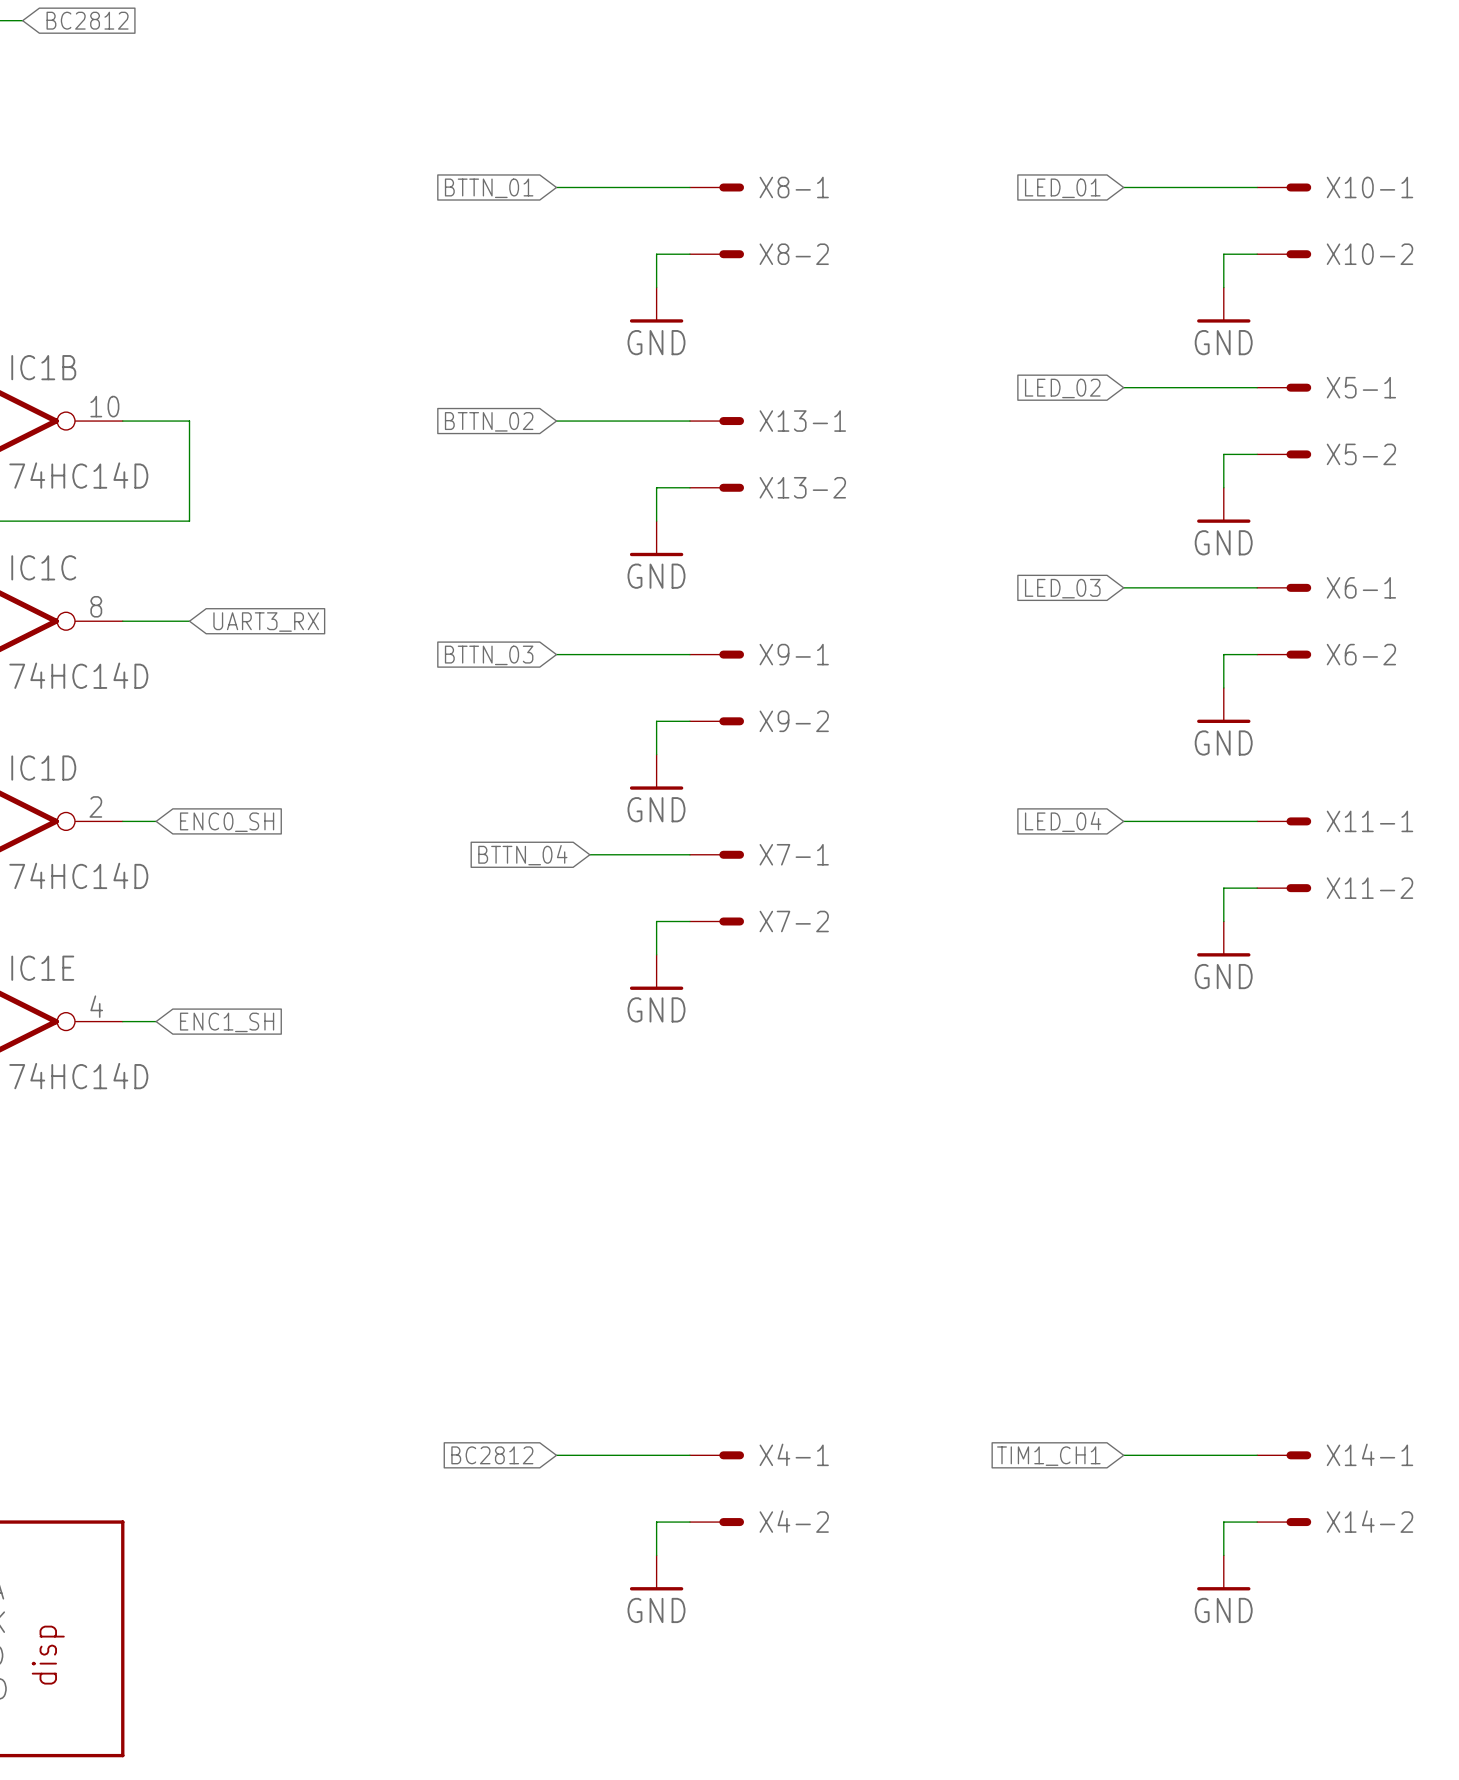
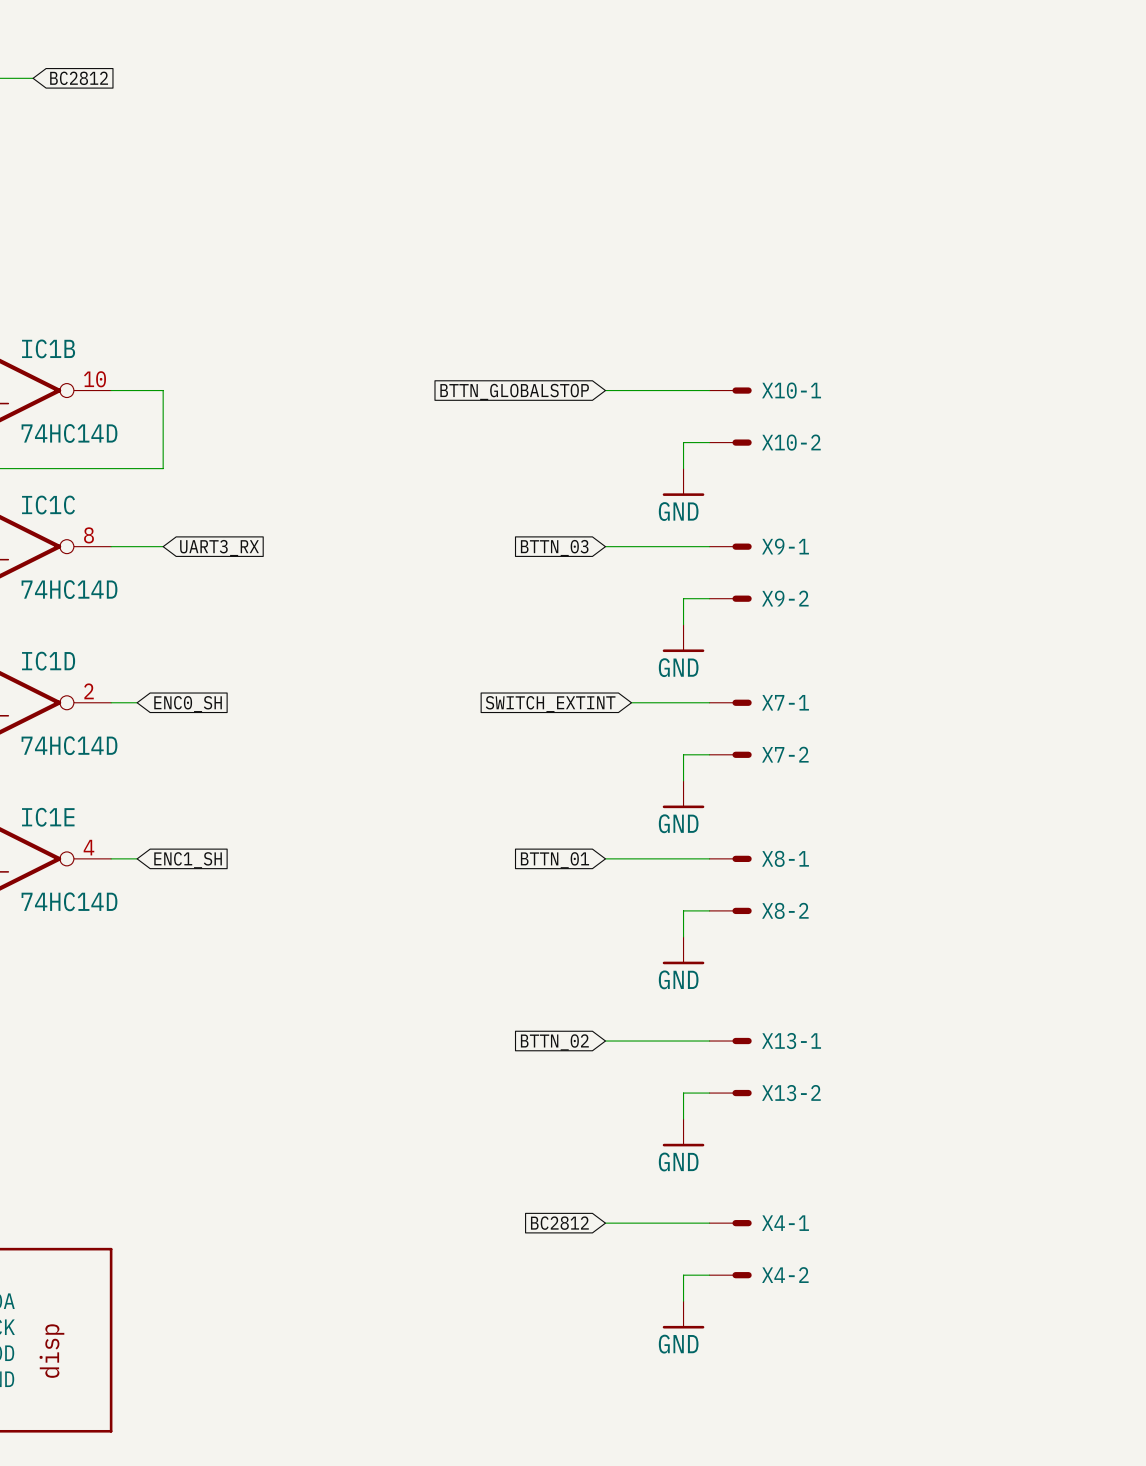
wire: (556, 187) (689, 187) -> none
X8-1 position: (716, 187) -> (730, 858)
wire: (1123, 187) (1257, 187) -> none
X10-1 position: (1284, 187) -> (730, 390)
global label: BTTN_01 (489, 188) -> none
global label: LED_01 (1062, 188) -> none
wire: (689, 254) (656, 254) (656, 287) -> none
X8-2 position: (716, 254) -> (730, 910)
wire: (1257, 254) (1223, 254) (1223, 287) -> none
X10-2 position: (1284, 254) -> (730, 442)
power symbol: GND (656, 305) -> none
power symbol: GND (1223, 305) -> none
wire: (1123, 387) (1257, 387) -> none
X5-1: (1284, 387) -> none
global label: LED_02 (1062, 388) -> none
global label: BTTN_02 (489, 421) -> none
wire: (556, 421) (689, 421) -> (605, 390) (709, 390)
global label: none -> BTTN_GLOBALSTOP (514, 392)
X13-1 position: (716, 421) -> (730, 1041)
wire: (1257, 454) (1223, 454) (1223, 487) -> none
X5-2: (1284, 454) -> none
wire: (689, 487) (656, 487) (656, 521) -> (709, 442) (683, 442) (683, 468)
X13-2 position: (716, 487) -> (730, 1093)
power symbol: GND (1223, 505) -> none
power symbol: GND (656, 538) -> none
power symbol: none -> GND (683, 482)
wire: (1123, 587) (1257, 587) -> none
X6-1: (1284, 587) -> none
global label: LED_03 (1062, 588) -> none
wire: (556, 654) (689, 654) -> (605, 546) (709, 546)
X9-1 position: (716, 654) -> (730, 546)
wire: (1257, 654) (1223, 654) (1223, 687) -> none
X6-2: (1284, 654) -> none
global label position: BTTN_03 (489, 655) -> BTTN_03 (554, 548)
power symbol: GND (1223, 705) -> none
wire: (689, 721) (656, 721) (656, 754) -> (709, 598) (683, 598) (683, 624)
X9-2 position: (716, 721) -> (730, 598)
power symbol: none -> GND (683, 638)
power symbol: GND (656, 772) -> none
global label: LED_04 (1063, 821) -> none
wire: (1123, 821) (1257, 821) -> none
X11-1: (1284, 821) -> none
global label: none -> SWITCH_EXTINT (550, 704)
wire: (589, 854) (689, 854) -> (631, 702) (709, 702)
X7-1 position: (716, 854) -> (730, 702)
global label: BTTN_04 (522, 855) -> none
wire: (1257, 888) (1223, 888) (1223, 921) -> none
X11-2: (1284, 888) -> none
wire: (689, 921) (656, 921) (656, 954) -> (709, 754) (683, 754) (683, 780)
X7-2 position: (716, 921) -> (730, 754)
power symbol: none -> GND (683, 794)
power symbol: GND (1223, 939) -> none
power symbol: GND (656, 972) -> none
wire: none -> (605, 858) (709, 858)
global label: none -> BTTN_01 (554, 860)
wire: none -> (709, 910) (683, 910) (683, 936)
power symbol: none -> GND (683, 950)
global label: none -> BTTN_02 (554, 1042)
wire: none -> (605, 1041) (709, 1041)
wire: none -> (709, 1093) (683, 1093) (683, 1119)
power symbol: none -> GND (683, 1132)
global label position: BC2812 (492, 1455) -> BC2812 (559, 1223)
wire: (556, 1455) (689, 1455) -> (605, 1223) (709, 1223)
X4-1 position: (716, 1455) -> (730, 1223)
wire: (1123, 1455) (1257, 1455) -> none
X14-1: (1284, 1455) -> none
global label: TIM1_CH1 (1048, 1456) -> none
wire: (689, 1522) (656, 1522) (656, 1555) -> (709, 1275) (683, 1275) (683, 1301)
X4-2 position: (716, 1522) -> (730, 1275)
wire: (1257, 1522) (1223, 1522) (1223, 1555) -> none
X14-2: (1284, 1522) -> none
power symbol: GND (656, 1572) -> none
power symbol: GND (1223, 1572) -> none
power symbol: none -> GND (683, 1314)

